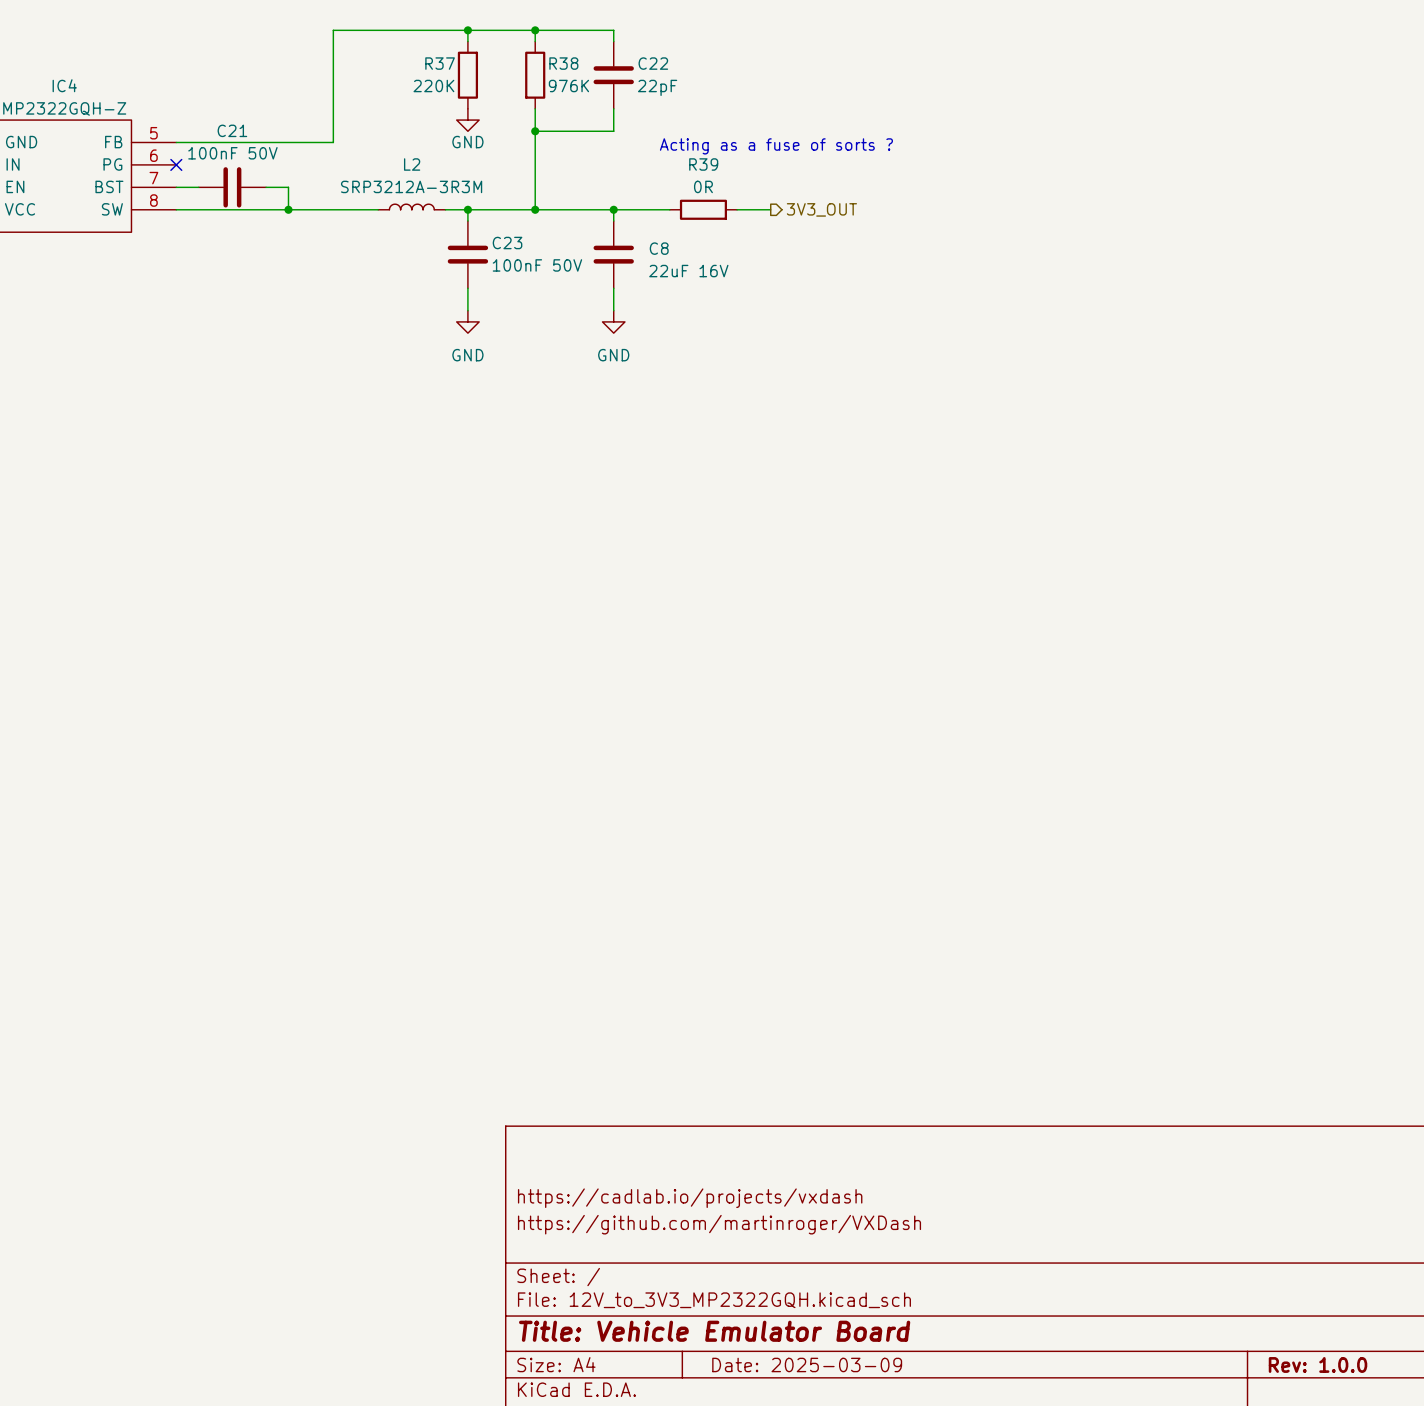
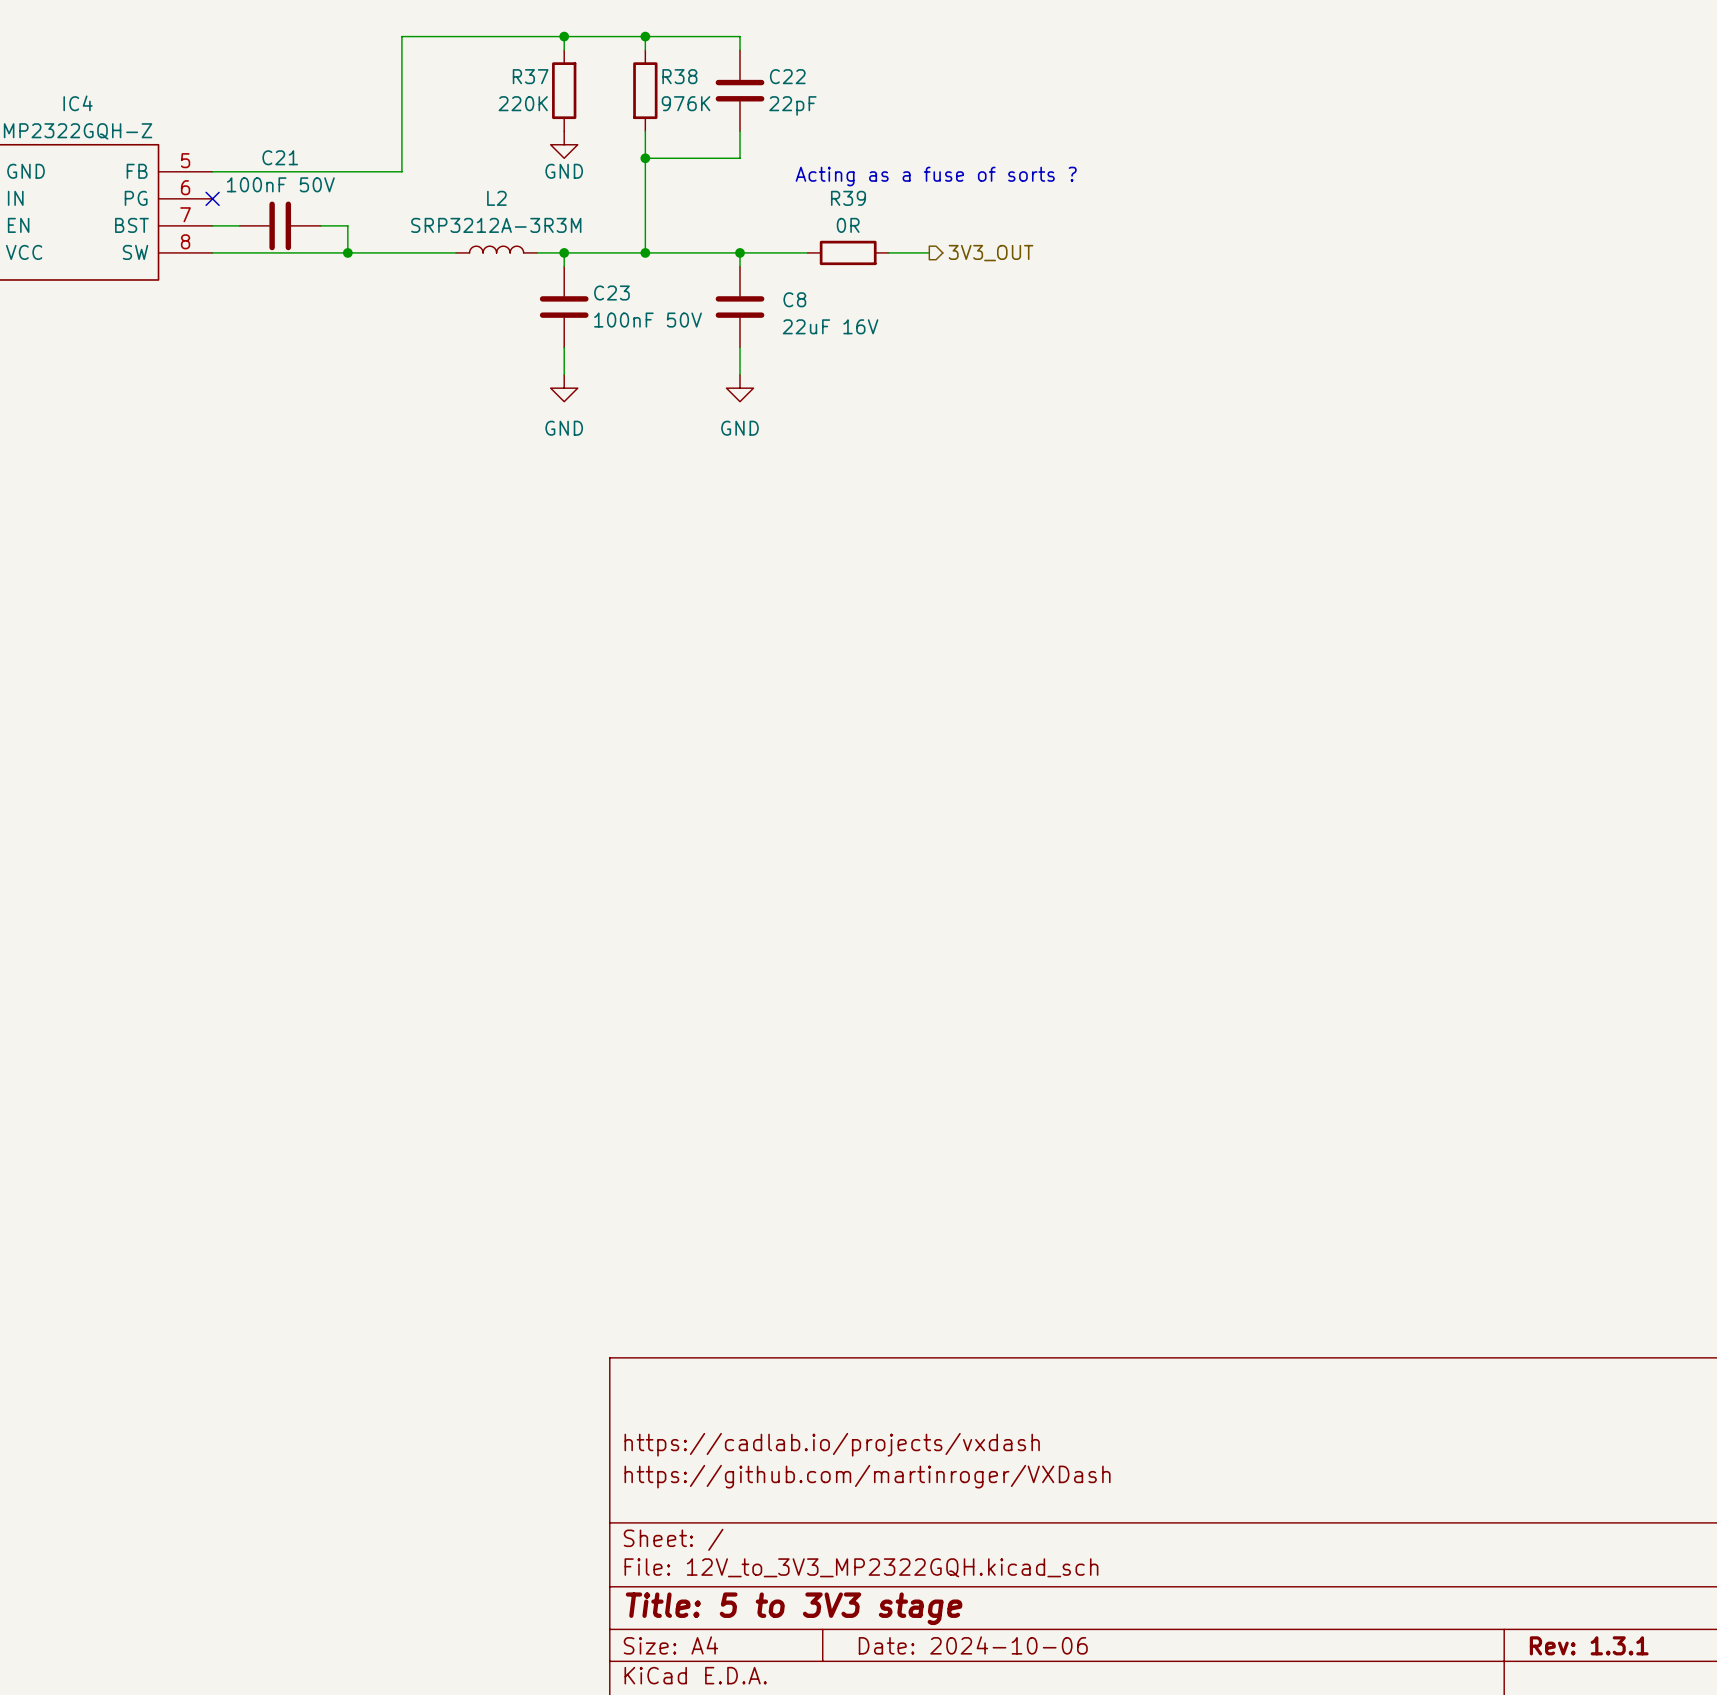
title block: Title: Vehicle Emulator Board (714, 1331) -> Title: 5 to 3V3 stage (794, 1608)
title block: Date: 2025-03-09 (807, 1364) -> Date: 2024-10-06 (973, 1645)
title block: Rev: 1.0.0 (1318, 1364) -> Rev: 1.3.1 (1589, 1645)

